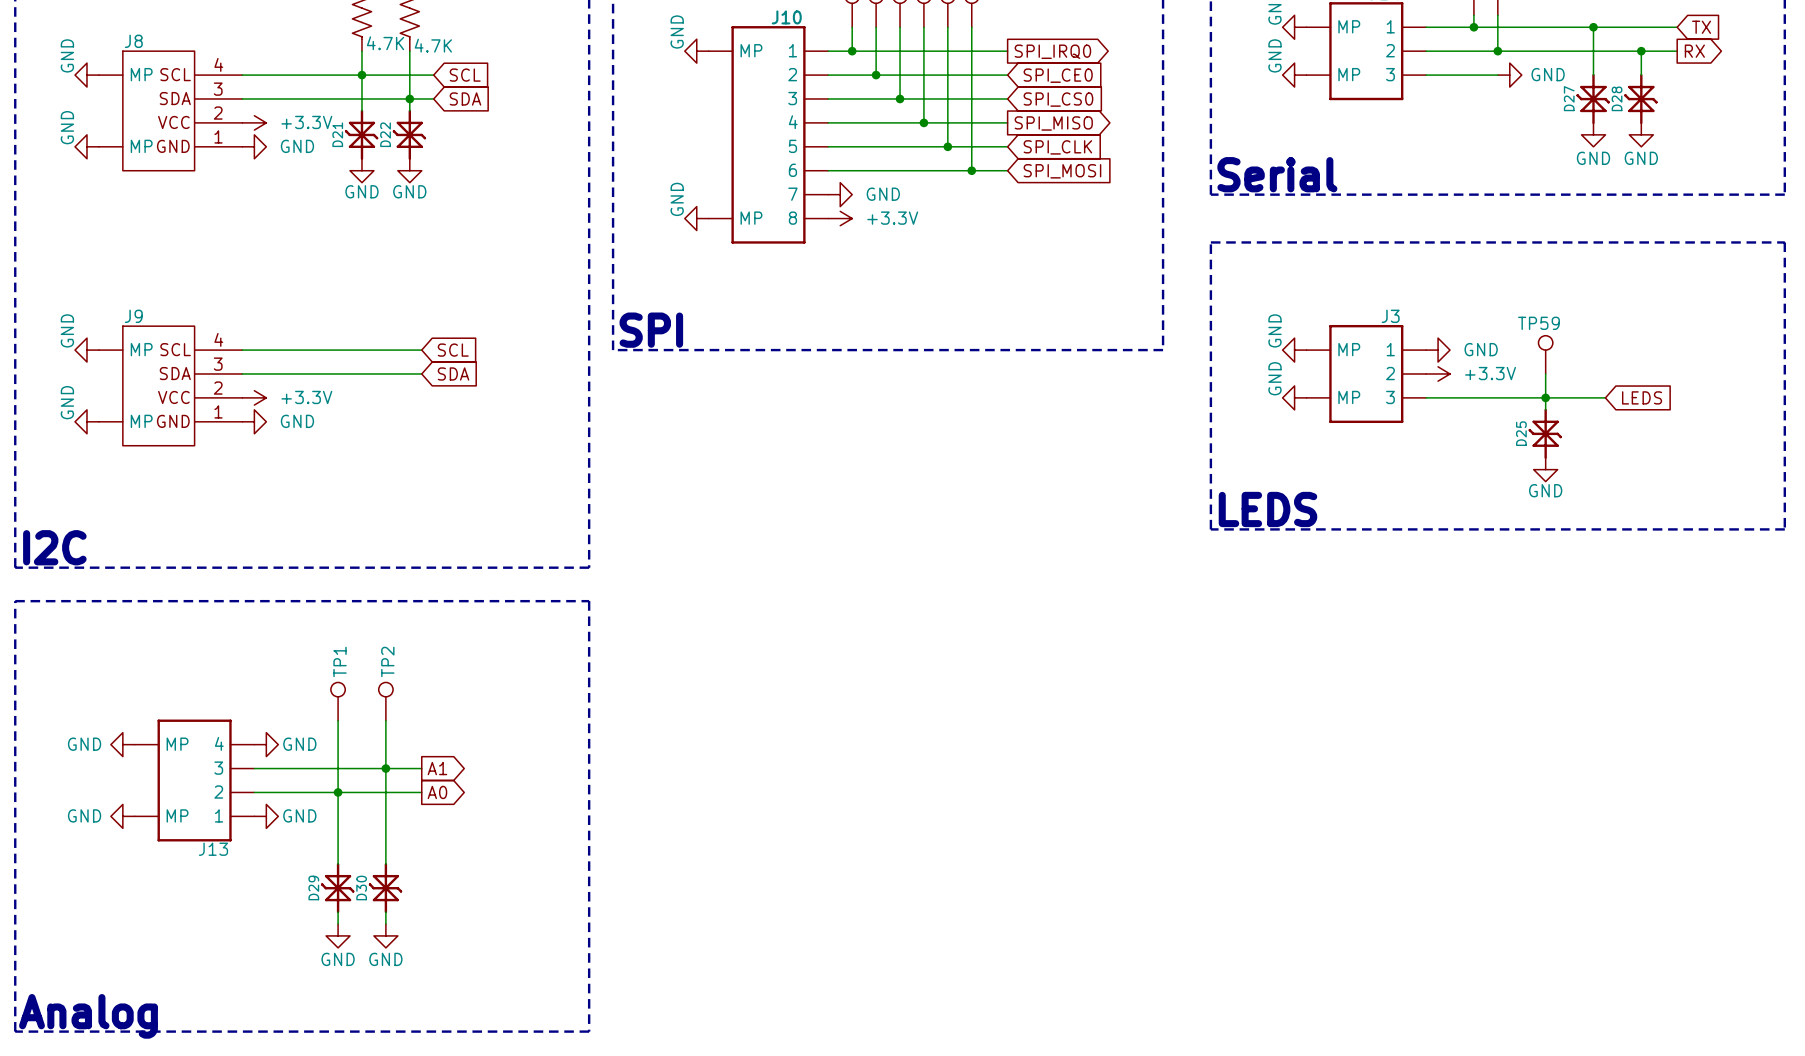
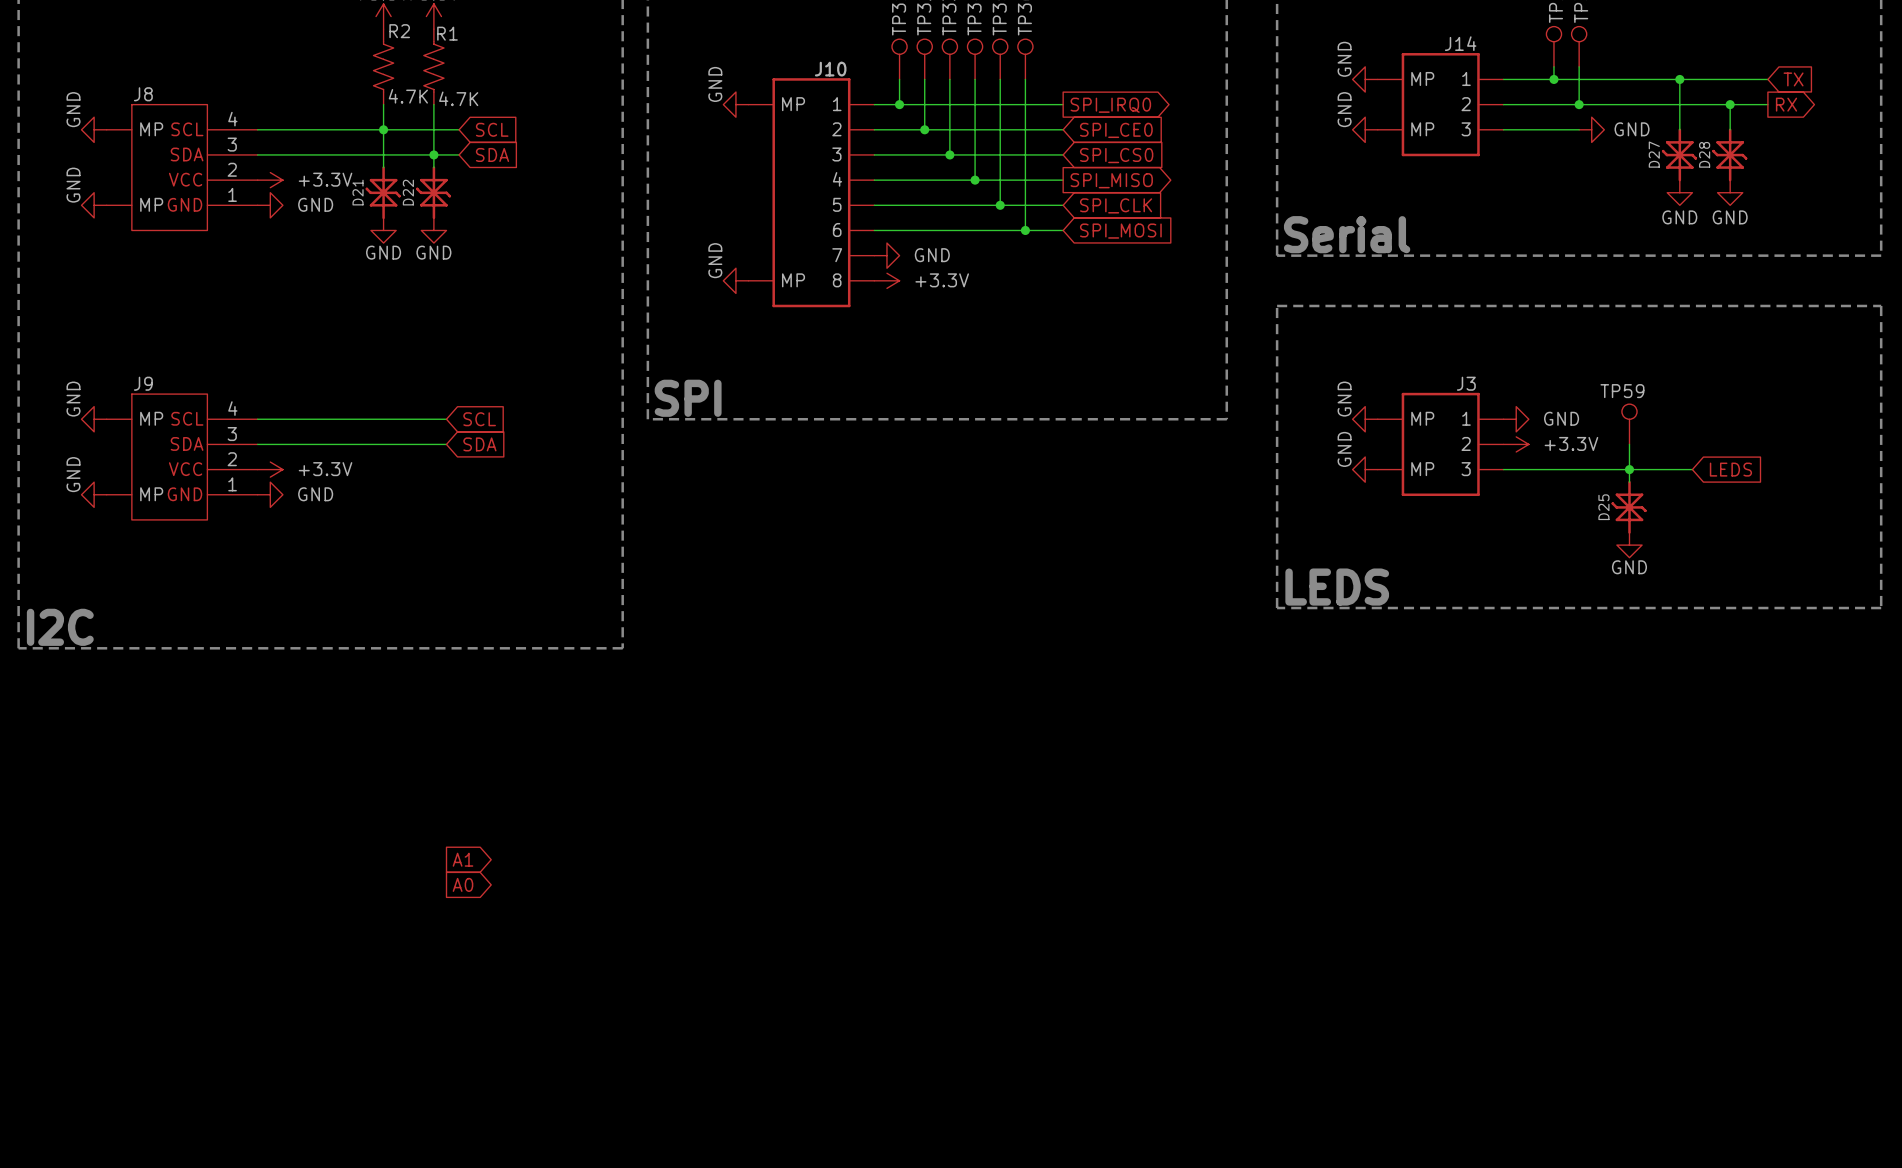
line: (15, 601) (589, 601) (589, 1031) (15, 1031) (15, 601) -> none
TP1: (338, 701) -> none
TP2: (385, 701) -> none
wire: (338, 720) (338, 864) -> none
wire: (385, 720) (385, 864) -> none
power symbol: GND (122, 744) -> none
power symbol: GND (266, 744) -> none
wire: (254, 768) (421, 768) -> none
junction: (385, 768) -> none
J13: (194, 780) -> none
wire: (254, 792) (421, 792) -> none
junction: (338, 792) -> none
power symbol: GND (122, 816) -> none
power symbol: GND (266, 816) -> none
D29: (337, 888) -> none
D30: (385, 888) -> none
wire: (338, 912) (338, 923) -> none
wire: (385, 912) (385, 923) -> none
power symbol: GND (338, 935) -> none
power symbol: GND (385, 935) -> none
text: Analog (88, 1016) -> none

